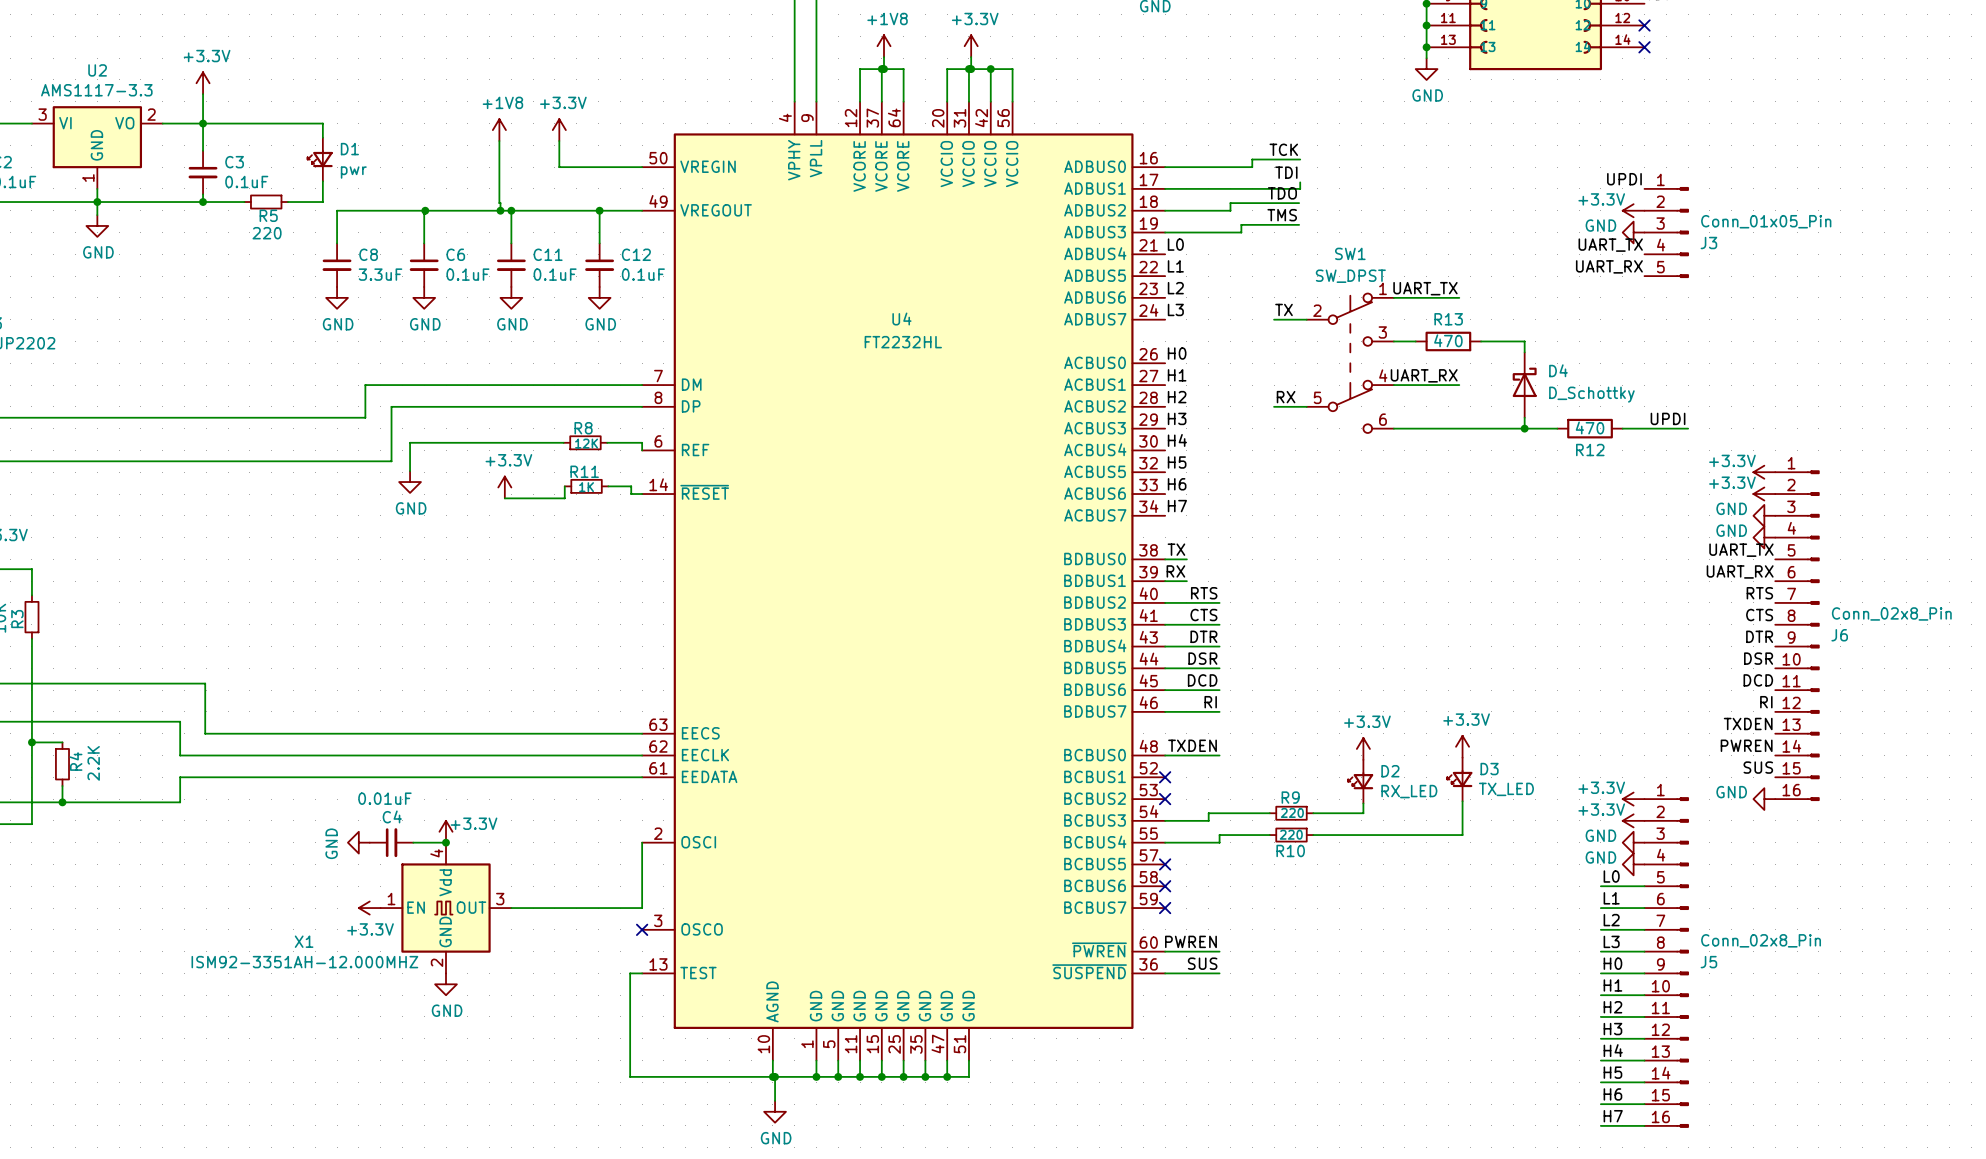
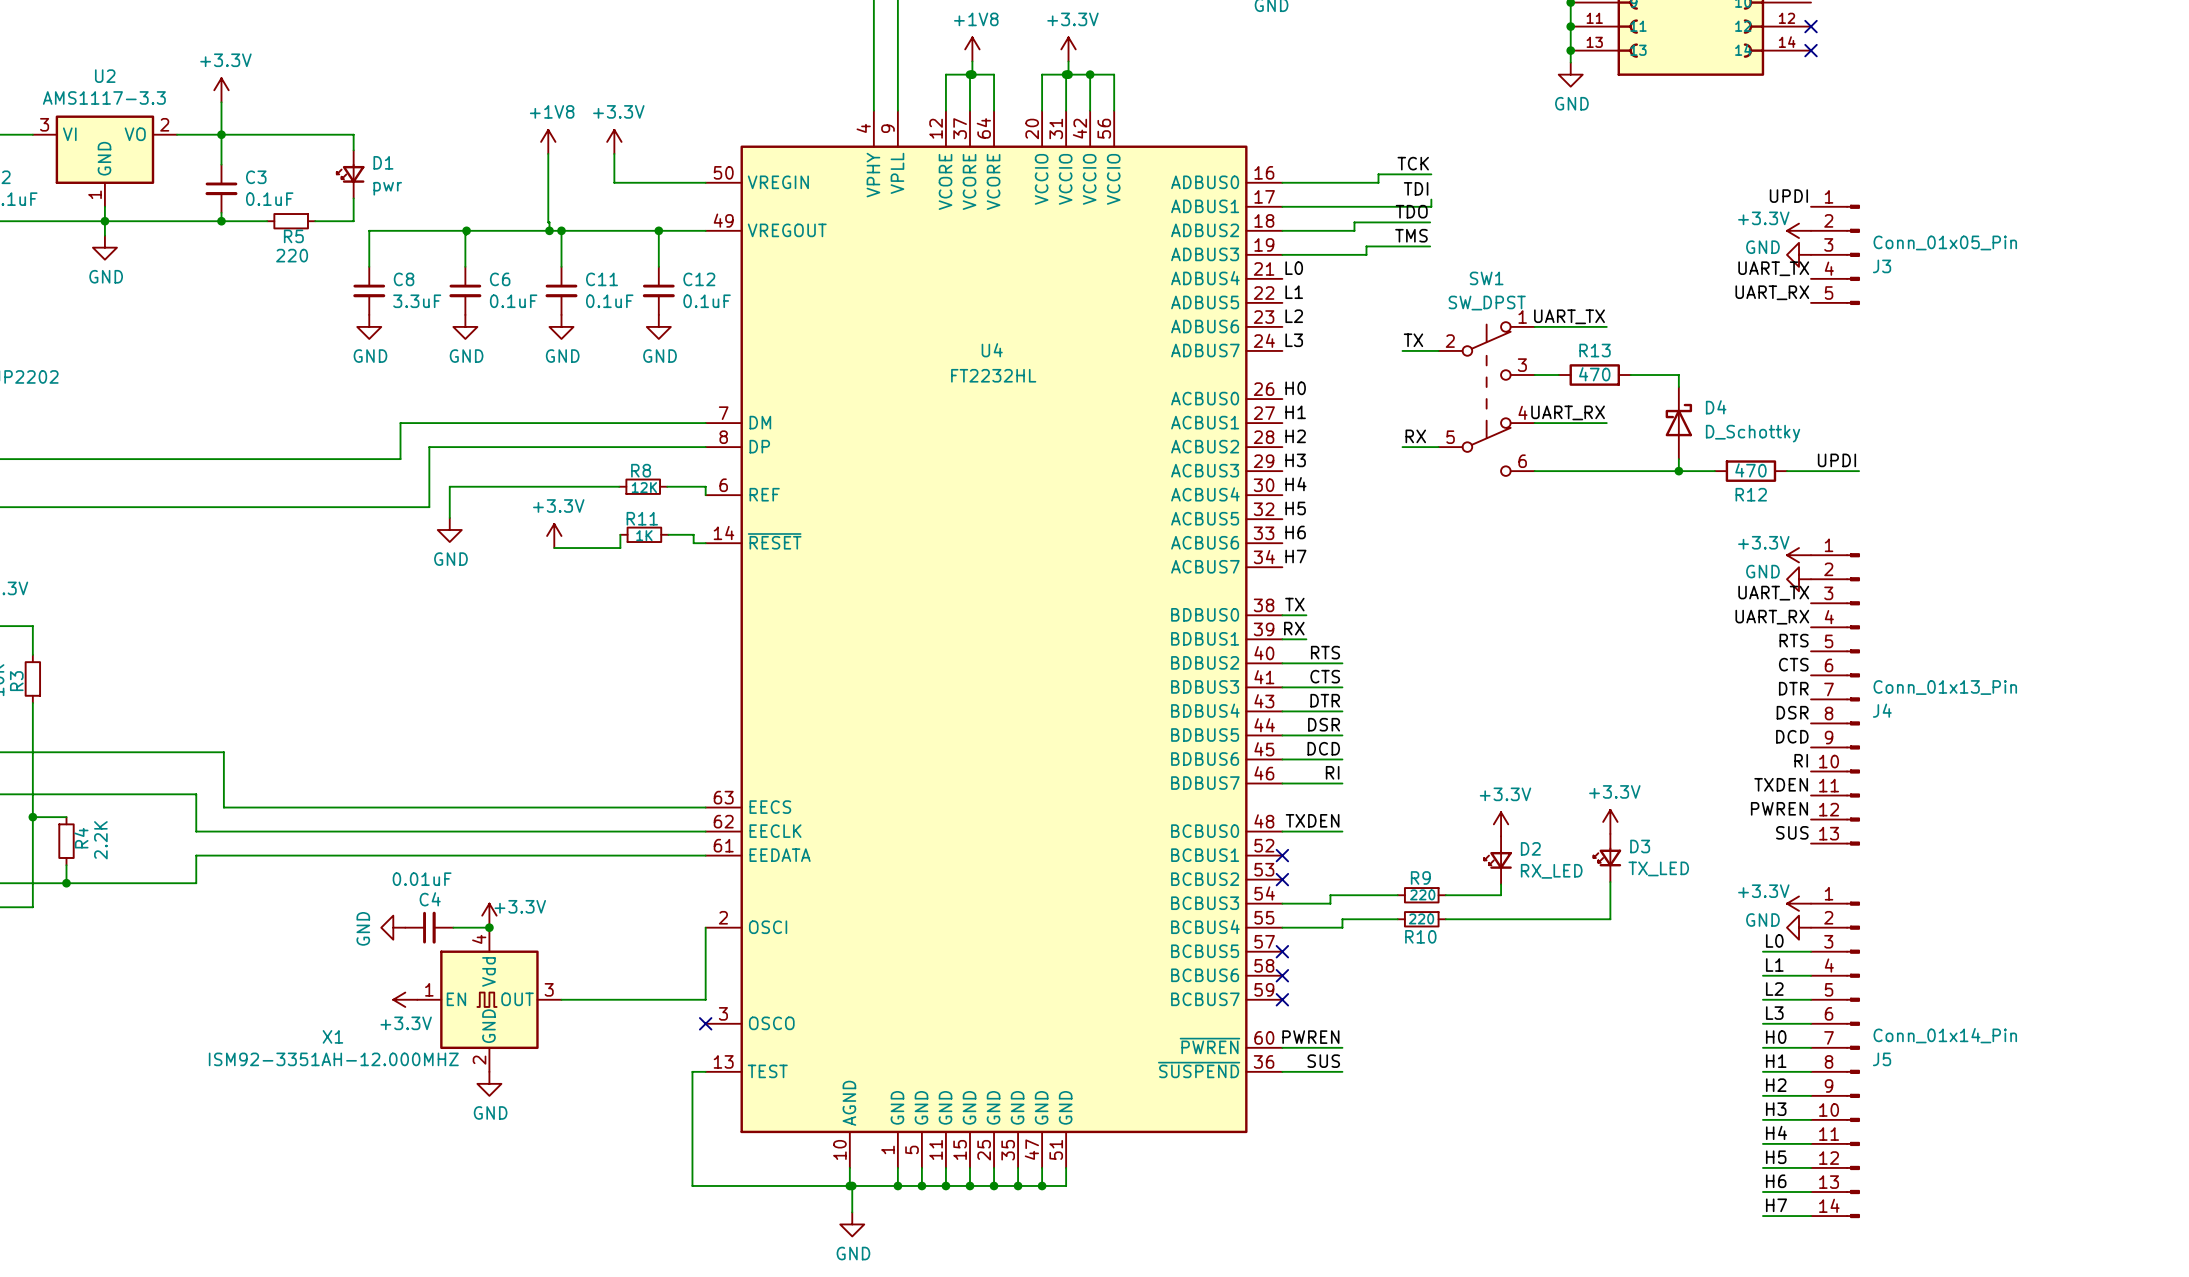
power symbol: +3.3V (1764, 472) -> none
power symbol: +3.3V (1764, 494) -> none
power symbol: none -> +3.3V (1799, 555)
power symbol: GND (1764, 515) -> none
power symbol: none -> GND (1799, 579)
power symbol: GND (1764, 537) -> none
label position: UART_TX (1741, 550) -> UART_TX (1773, 593)
label position: UART_RX (1740, 571) -> UART_RX (1772, 617)
label position: RTS (1759, 593) -> RTS (1794, 640)
label position: CTS (1759, 615) -> CTS (1793, 664)
J4: none -> Conn_01x13_Pin (1835, 699)
J6: Conn_02x8_Pin (1797, 635) -> none
label position: DTR (1759, 636) -> DTR (1793, 688)
label position: DSR (1758, 658) -> DSR (1792, 712)
label position: DCD (1758, 680) -> DCD (1792, 736)
label position: RI (1766, 702) -> RI (1801, 760)
label position: TXDEN (1748, 723) -> TXDEN (1781, 784)
label position: PWREN (1746, 745) -> PWREN (1779, 808)
label position: SUS (1758, 767) -> SUS (1792, 832)
J5 symbol: [1644, 797, 1689, 1128] -> [1811, 901, 1860, 1218]
power symbol: +3.3V (1633, 799) -> none
power symbol: GND (1764, 799) -> none
label: none -> L0 (1774, 940)
wire: none -> (1762, 951) (1811, 951)
power symbol: GND (1633, 864) -> none
label: L0 (1611, 876) -> L1 (1774, 965)
label: L1 (1611, 898) -> L2 (1774, 989)
label: L2 (1611, 920) -> L3 (1774, 1013)
J5 value: Conn_02x8_Pin (1761, 940) -> Conn_01x14_Pin (1945, 1035)
label: L3 (1611, 941) -> H0 (1776, 1037)
label: H0 (1612, 963) -> H1 (1776, 1061)
label: H1 (1612, 985) -> H2 (1776, 1085)
label: H2 (1612, 1007) -> H3 (1776, 1109)
label: H3 (1612, 1029) -> H4 (1776, 1132)
label: H4 (1613, 1050) -> H5 (1776, 1157)
label: H5 (1612, 1072) -> H6 (1776, 1181)
label: H6 (1612, 1094) -> H7 (1776, 1205)
label: H7 (1613, 1116) -> none
wire: (1600, 1125) (1644, 1125) -> none

